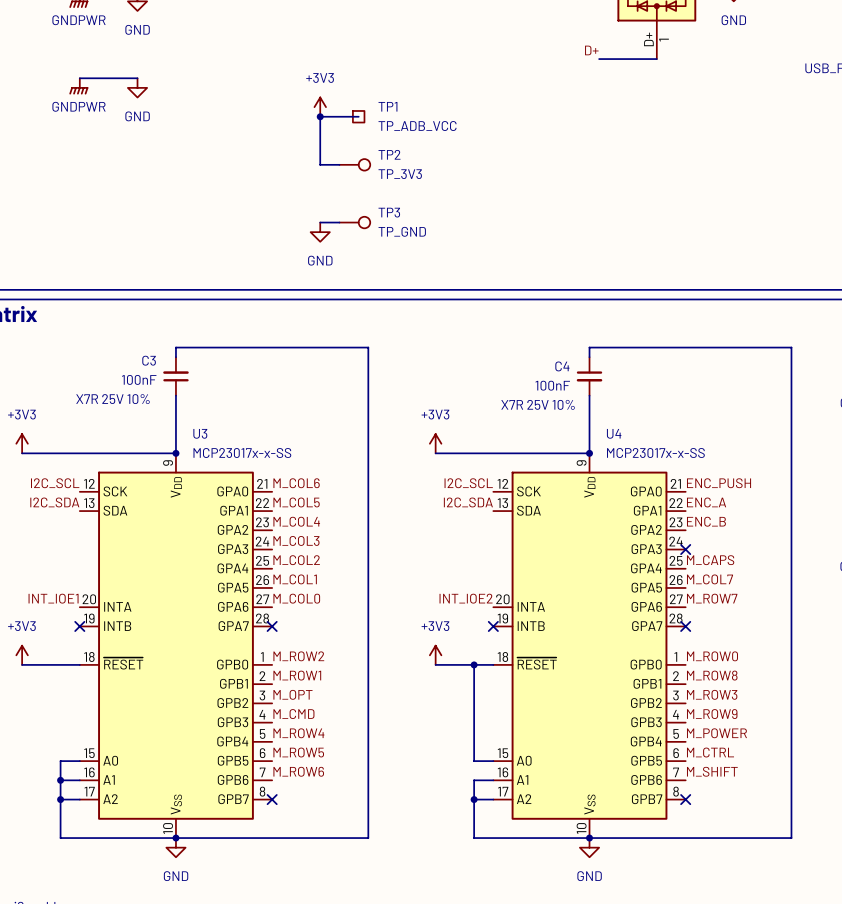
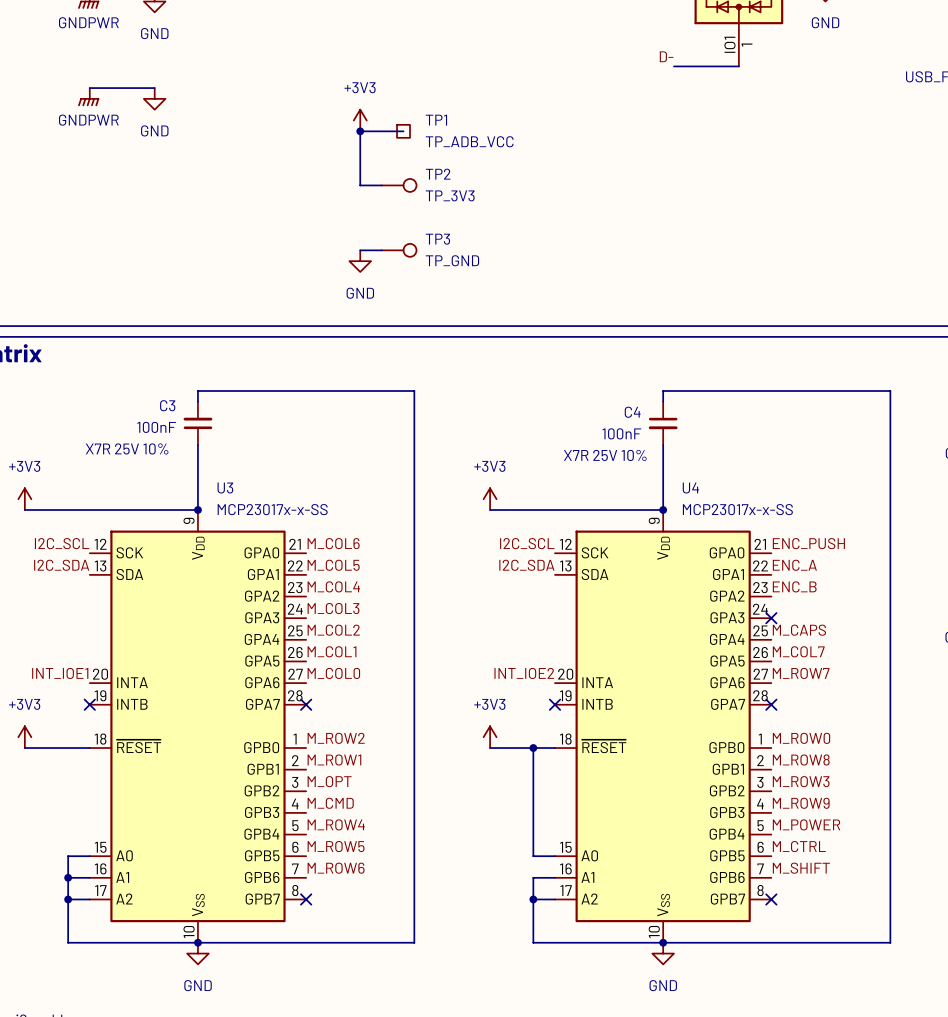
part pin name: D+ (648, 39) -> IO1 (729, 44)
label: D+ (591, 50) -> D- (666, 56)

